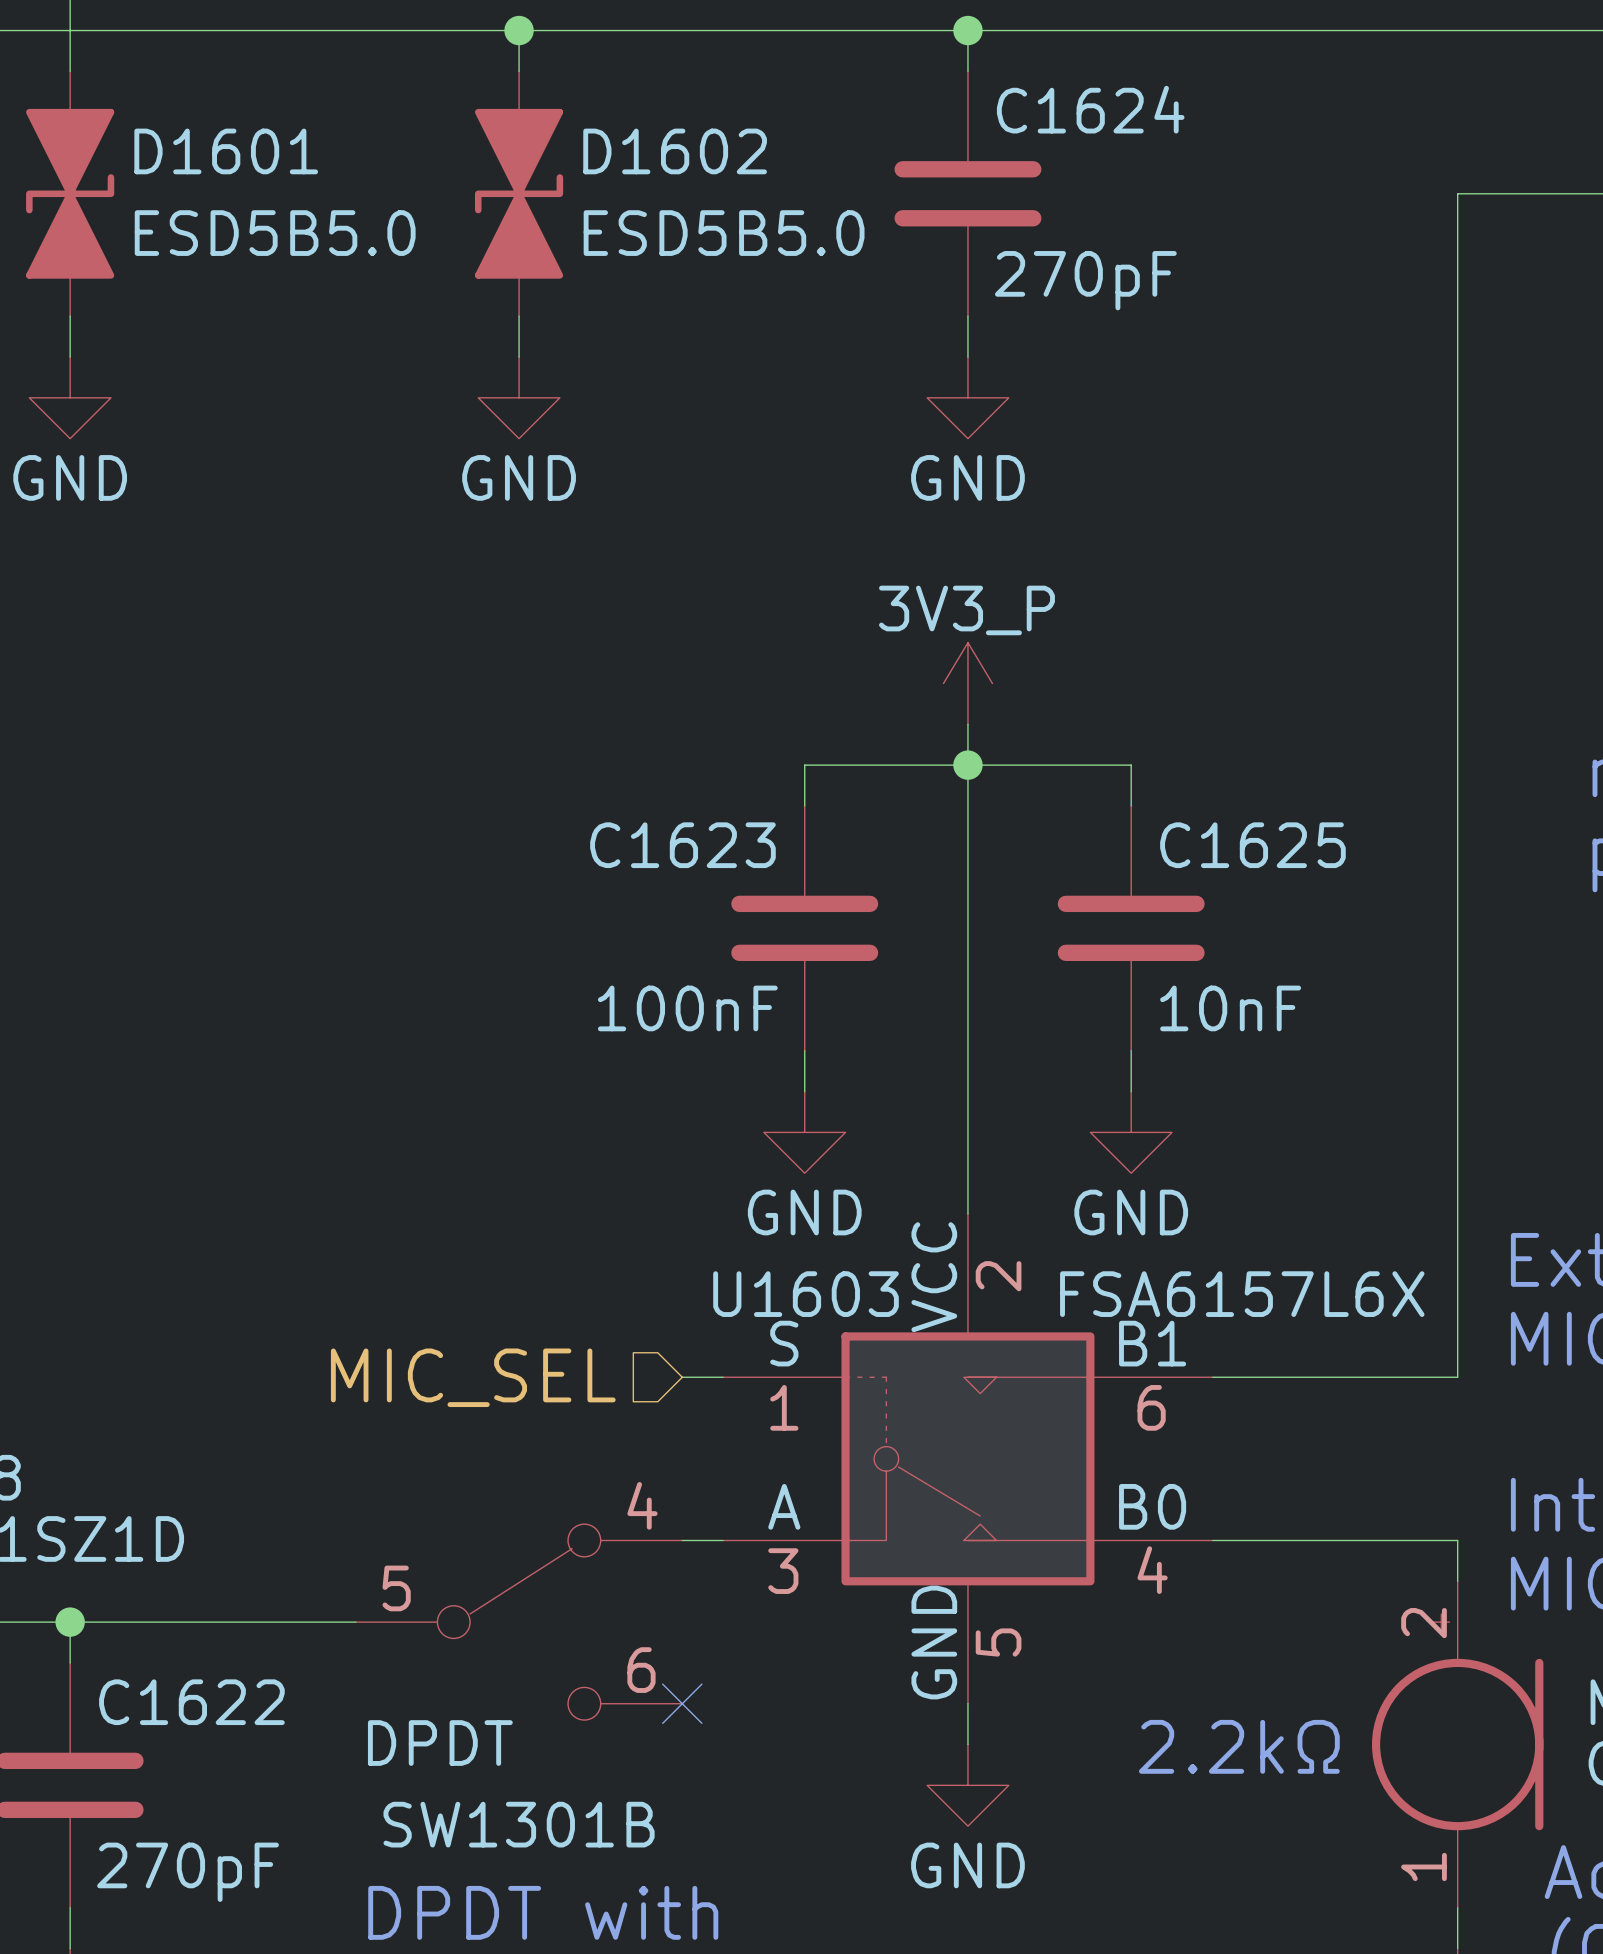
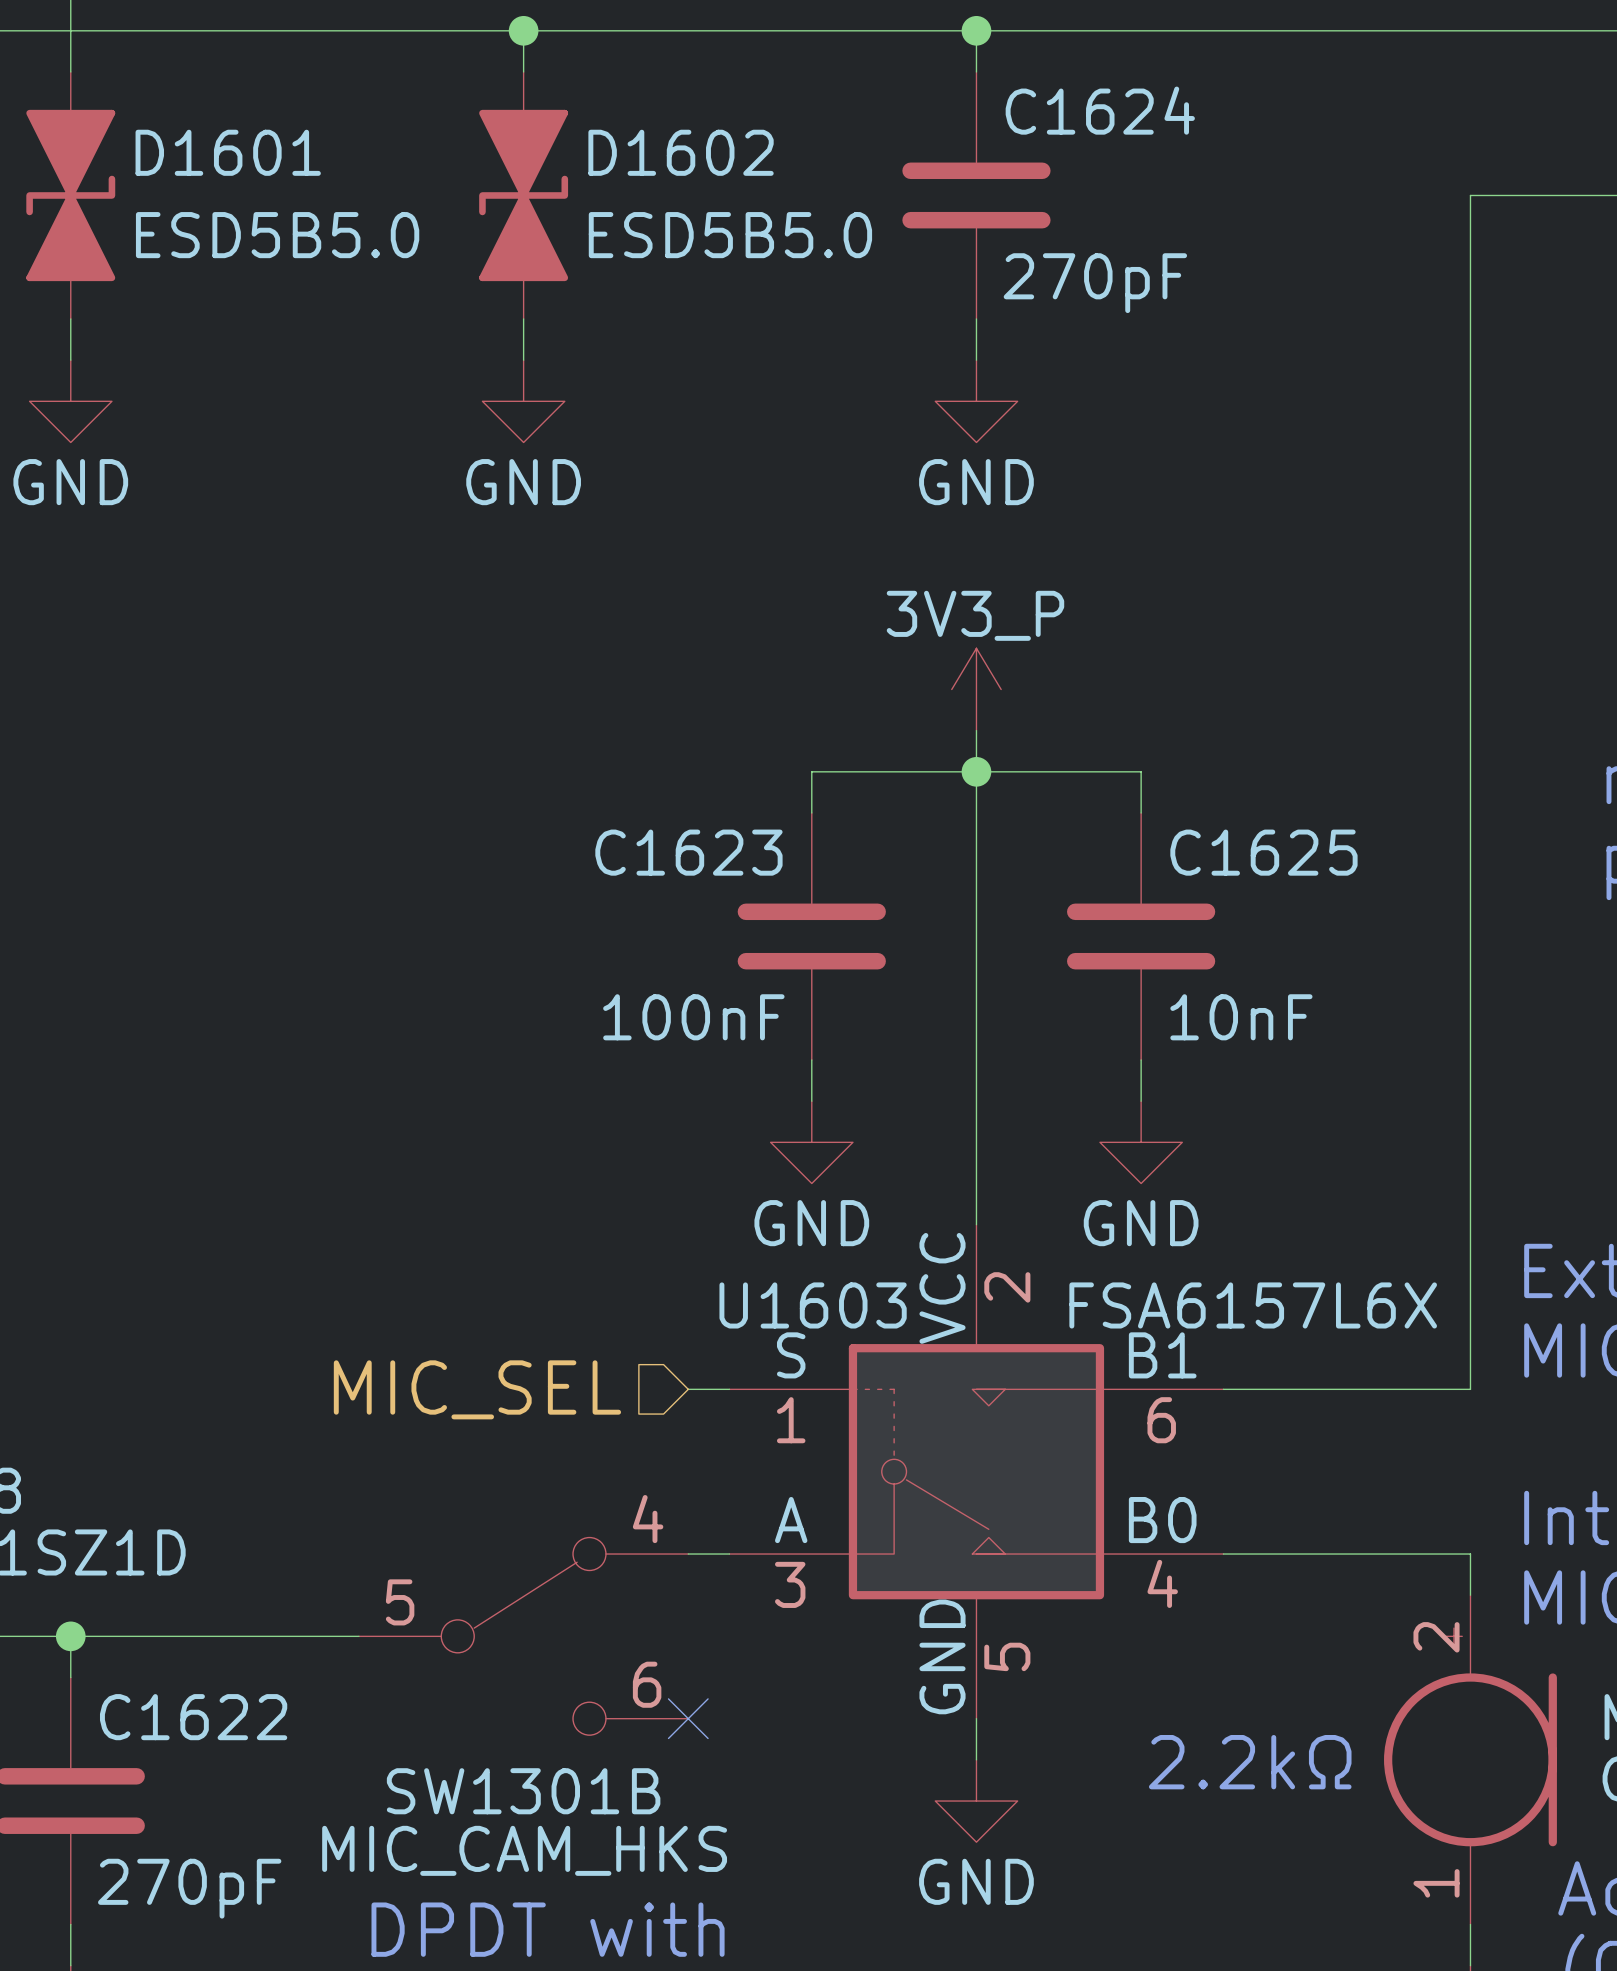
SW1301B value: DPDT (440, 1743) -> MIC_CAM_HKS (524, 1850)
SW1301B name position: SW1301B (519, 1824) -> SW1301B (523, 1791)

